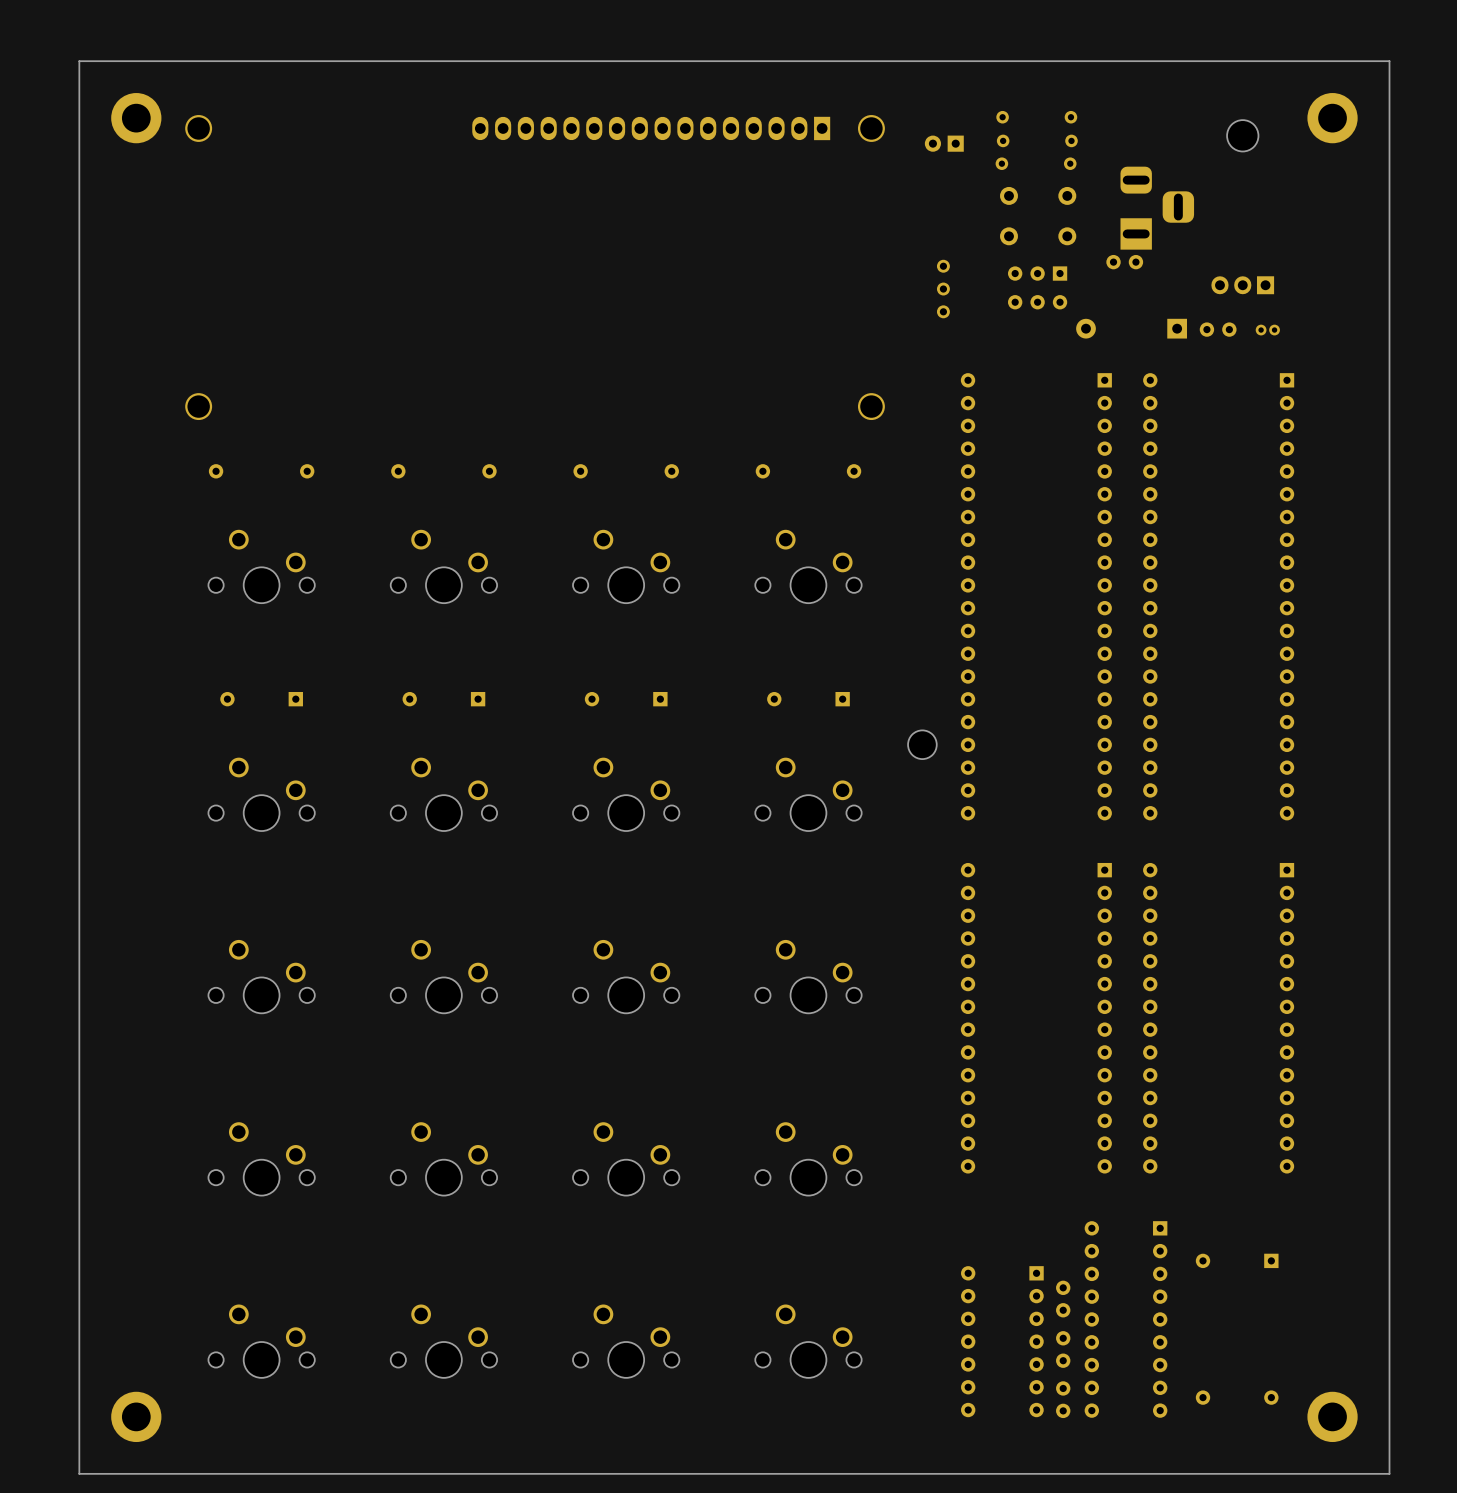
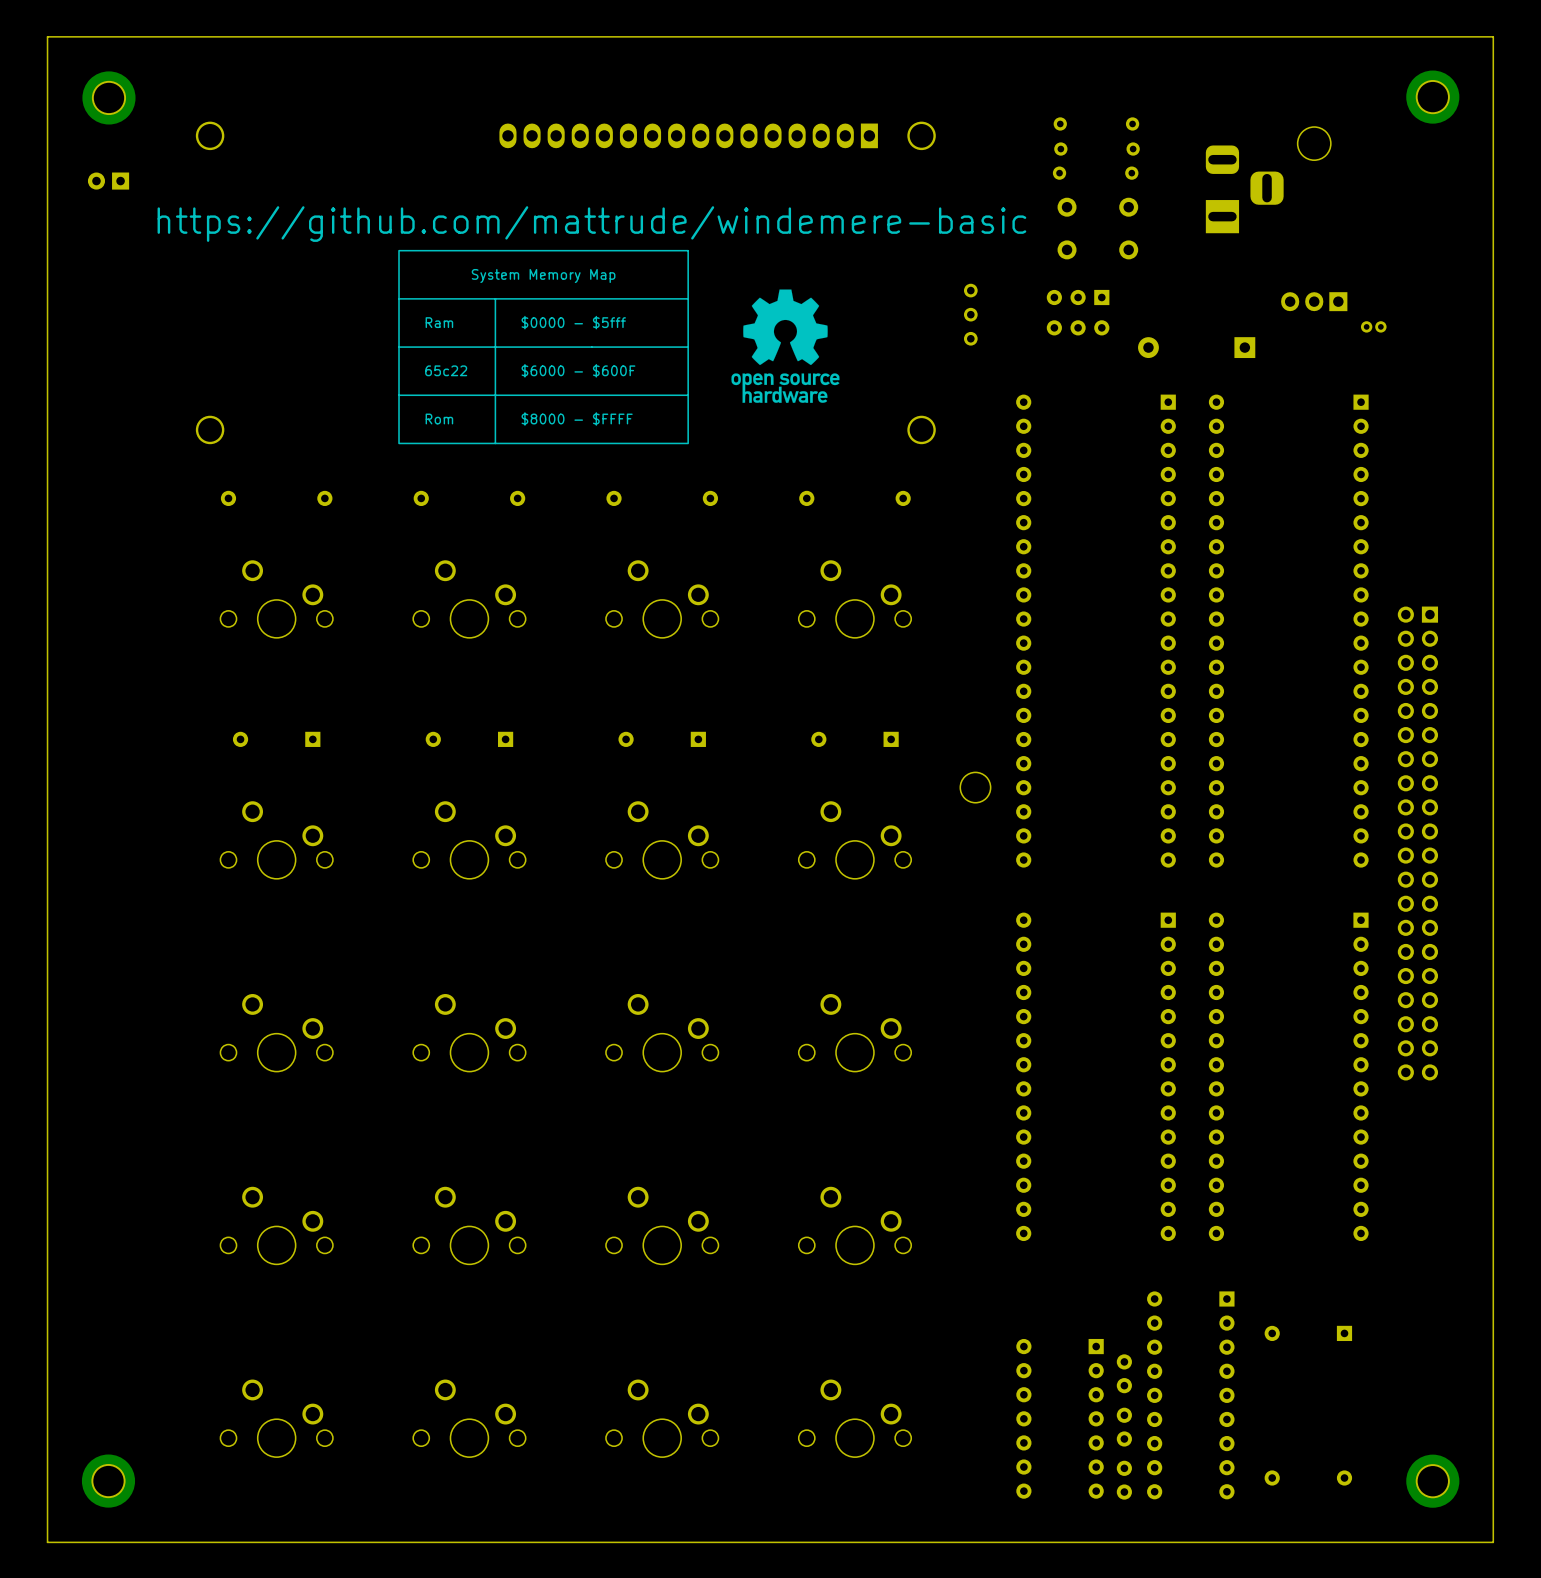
board edge: (1389, 61) (1389, 1473) (79, 1473) (79, 61) (1389, 61) -> (1493, 36) (1493, 1542) (47, 1542) (47, 36) (1493, 36)
part position: (136, 118) -> (108, 97)
part position: (1332, 118) -> (1432, 97)
part: (944, 143) -> none
part: none -> (108, 181)
part position: (1157, 208) -> (1244, 189)
text: none -> https://github.com/mattrude/windemere-basic (591, 224)
drawing: none -> [398, 250, 689, 445]
part: (1124, 262) -> none
drawing: none -> [731, 289, 840, 403]
part position: (1037, 287) -> (1078, 312)
part position: (943, 289) -> (970, 314)
part: (1218, 329) -> none
part position: (1267, 330) -> (1373, 326)
part: none -> (1417, 843)
part position: (136, 1416) -> (108, 1481)
part position: (1332, 1416) -> (1432, 1481)

